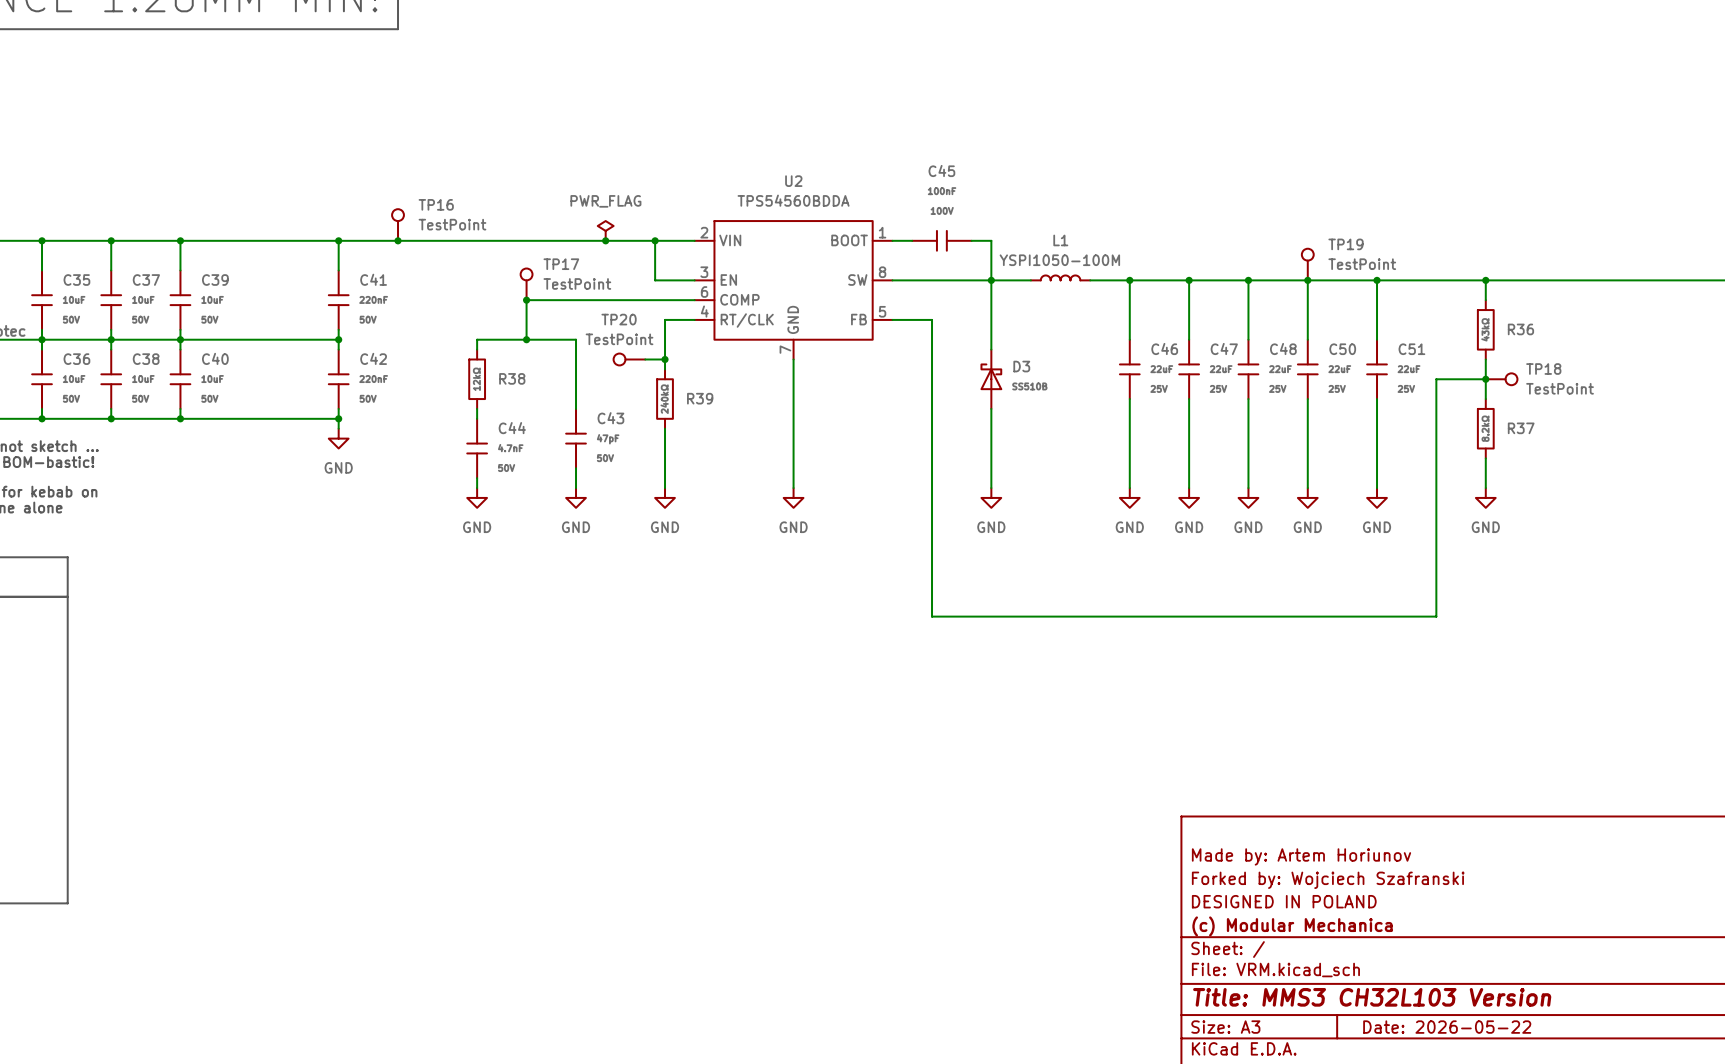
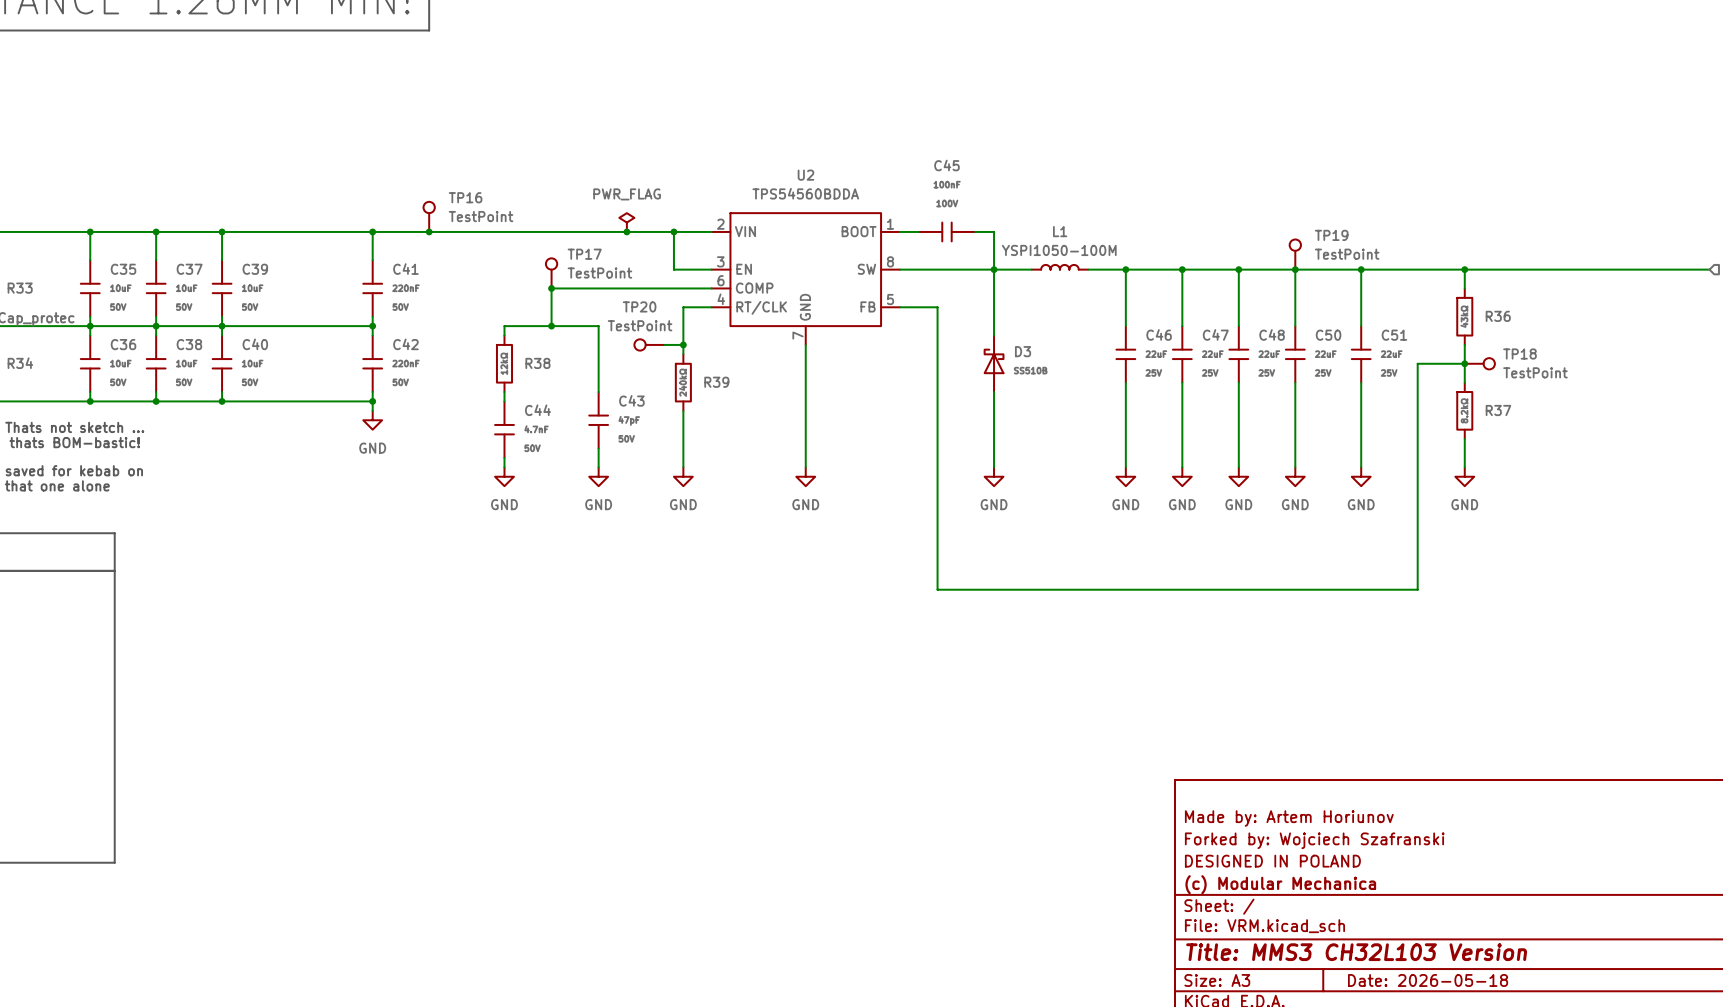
title block: Date: 2026-05-22 (1447, 1027) -> Date: 2026-05-18 (1428, 980)

